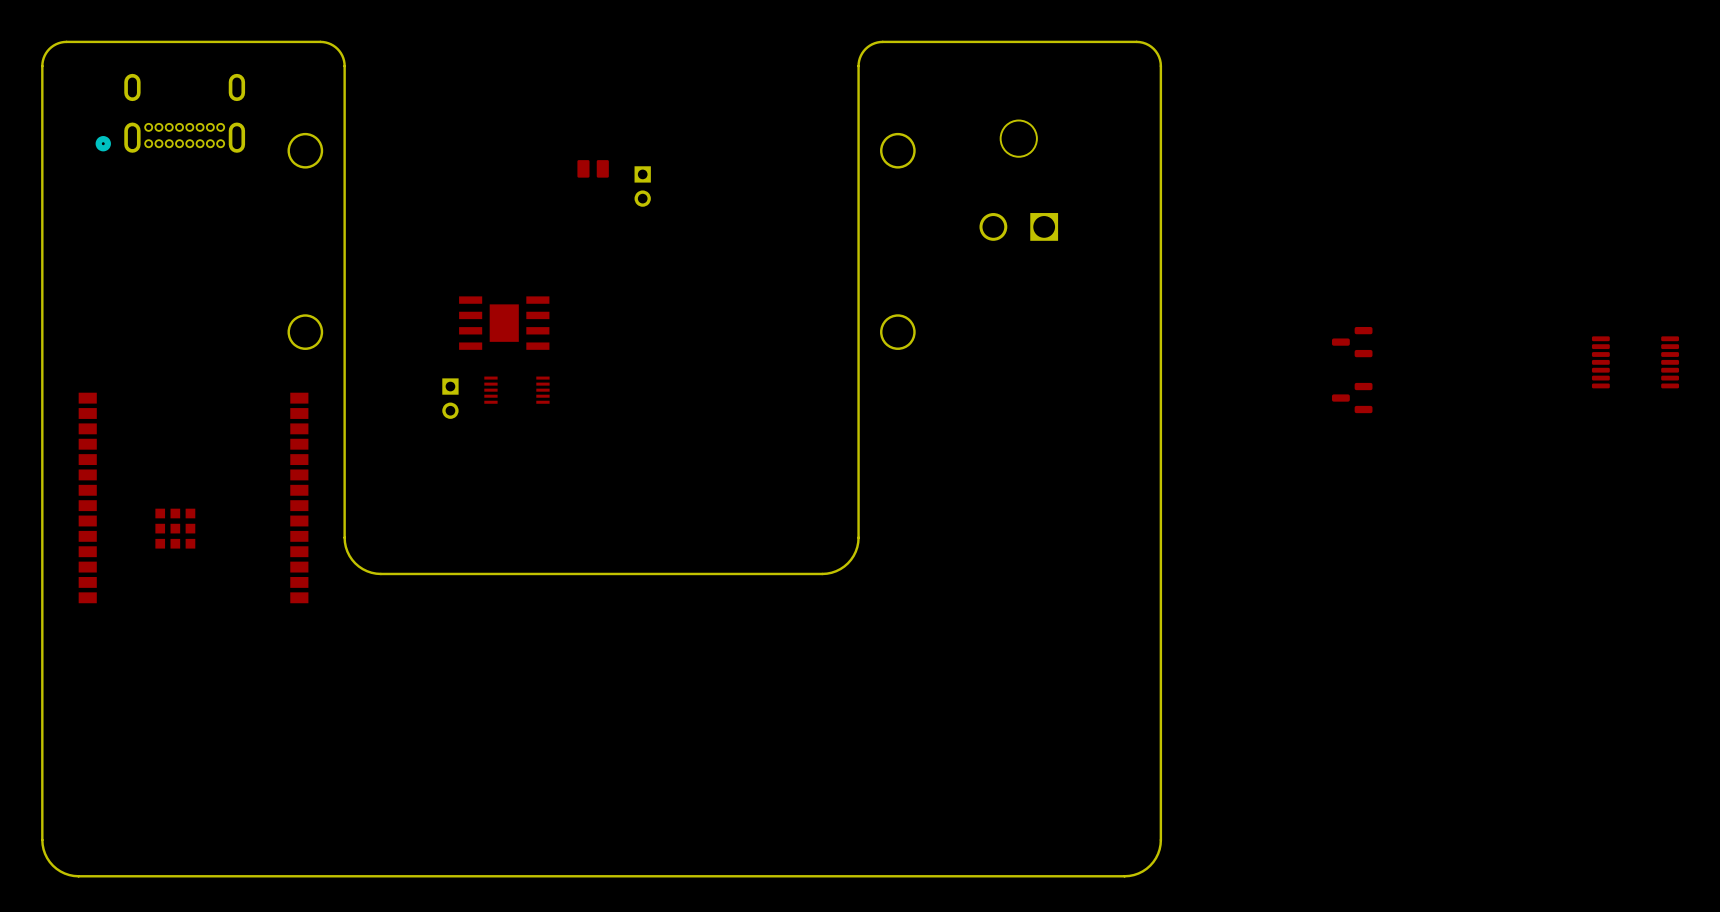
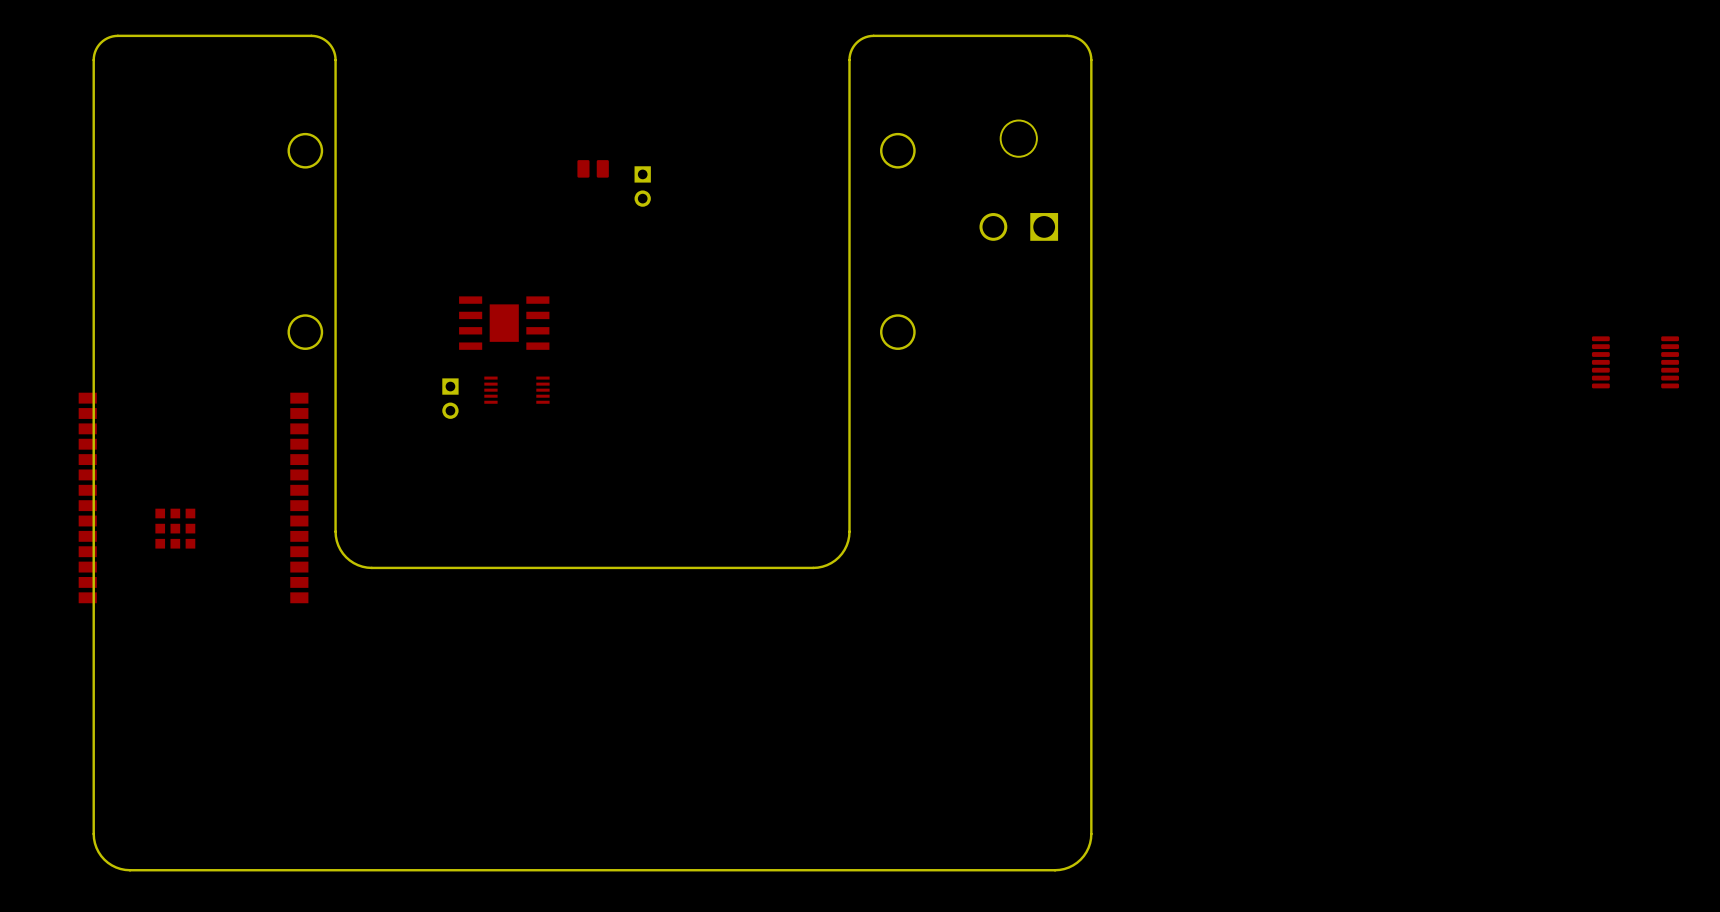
board edge: (1136, 41) (882, 41) (869, 45) (862, 53) (858, 66) (858, 542) (853, 555) (844, 566) (836, 571) (822, 573) (380, 573) (371, 572) (358, 566) (349, 555) (344, 537) (344, 66) (340, 53) (333, 45) (320, 41) (66, 41) (51, 47) (44, 55) (42, 66) (42, 840) (43, 849) (49, 862) (60, 871) (78, 876) (1124, 876) (1133, 875) (1146, 868) (1156, 858) (1160, 840) (1160, 66) (1159, 56) (1153, 48) (1145, 43) (1136, 41) -> (1067, 35) (1076, 37) (1084, 42) (1089, 50) (1091, 60) (1091, 833) (1088, 847) (1077, 862) (1068, 867) (1055, 870) (129, 870) (116, 867) (101, 856) (96, 847) (93, 833) (93, 60) (96, 49) (102, 41) (117, 35) (311, 35) (324, 39) (333, 49) (335, 60) (335, 531) (340, 549) (349, 560) (357, 565) (371, 567) (813, 567) (827, 565) (838, 557) (844, 549) (849, 536) (849, 60) (851, 49) (860, 39) (870, 36) (1067, 35)
part: (170, 113) -> none
part: (1352, 342) -> none
part: (1352, 398) -> none

